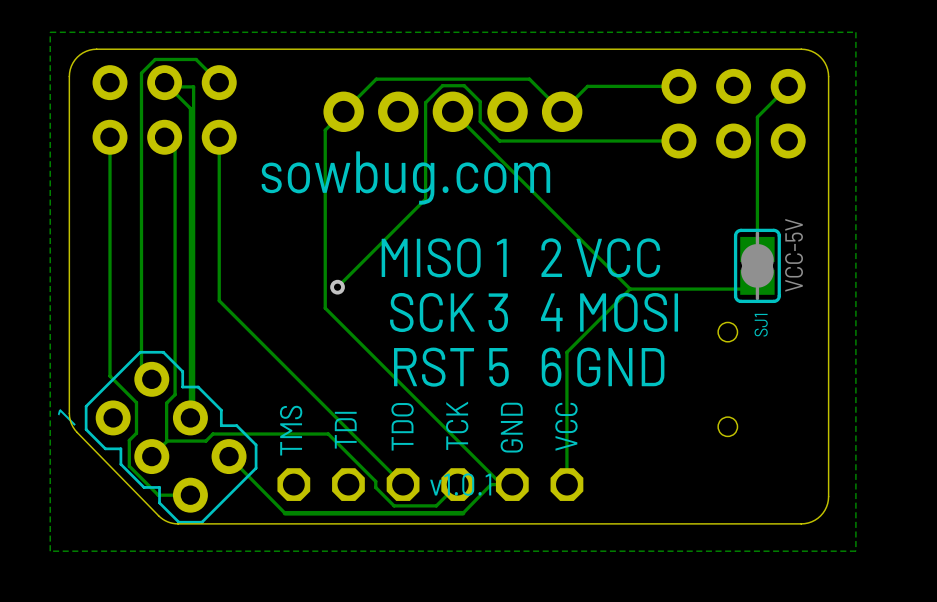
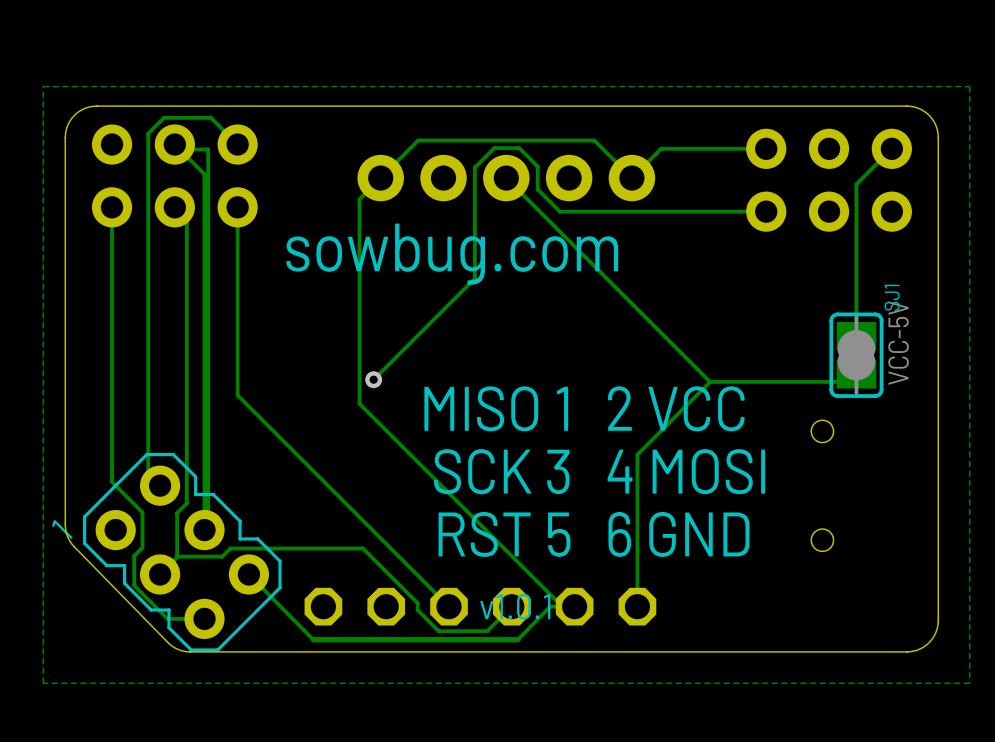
text: MISO 1 (444, 257) -> none
text: 2 VCC (600, 257) -> none
text: SCK 3 (449, 312) -> MISO 1 (496, 408)
text: 4 MOSI (609, 312) -> 2 VCC (676, 408)
SJ1 name position: SJ1 (761, 325) -> SJ1 (892, 297)
text: RST 5 (451, 367) -> SCK 3 (501, 471)
text: 6 GND (603, 367) -> 4 MOSI (686, 471)
text: none -> RST 5 (504, 534)
text: none -> 6 GND (678, 534)
text: TCK (457, 425) -> none
text: TDO (402, 426) -> none
text: VCC (566, 426) -> none
text: GND (511, 427) -> none
text: TMS (291, 430) -> none
text: TDI (345, 430) -> none

